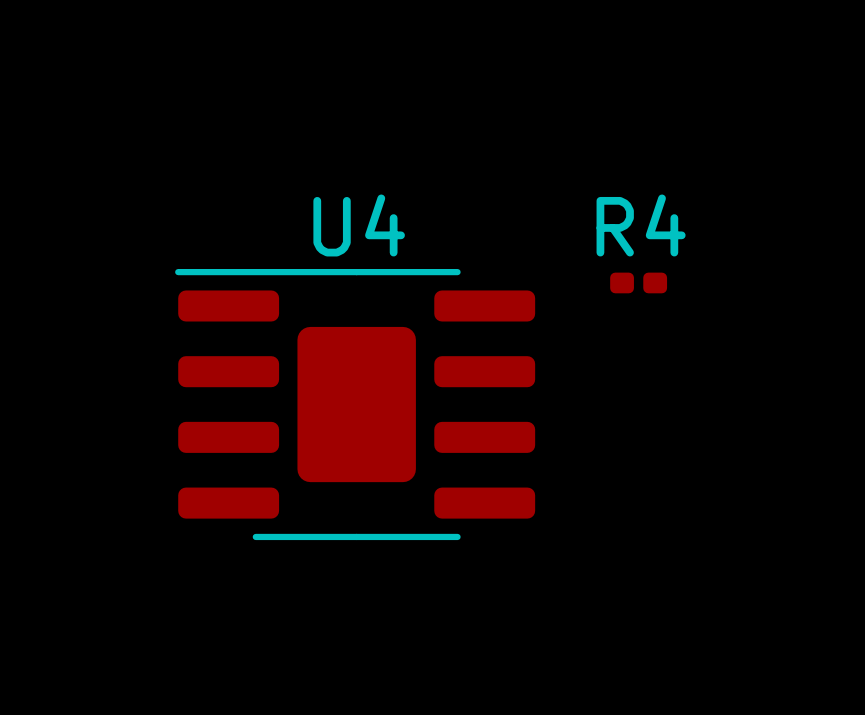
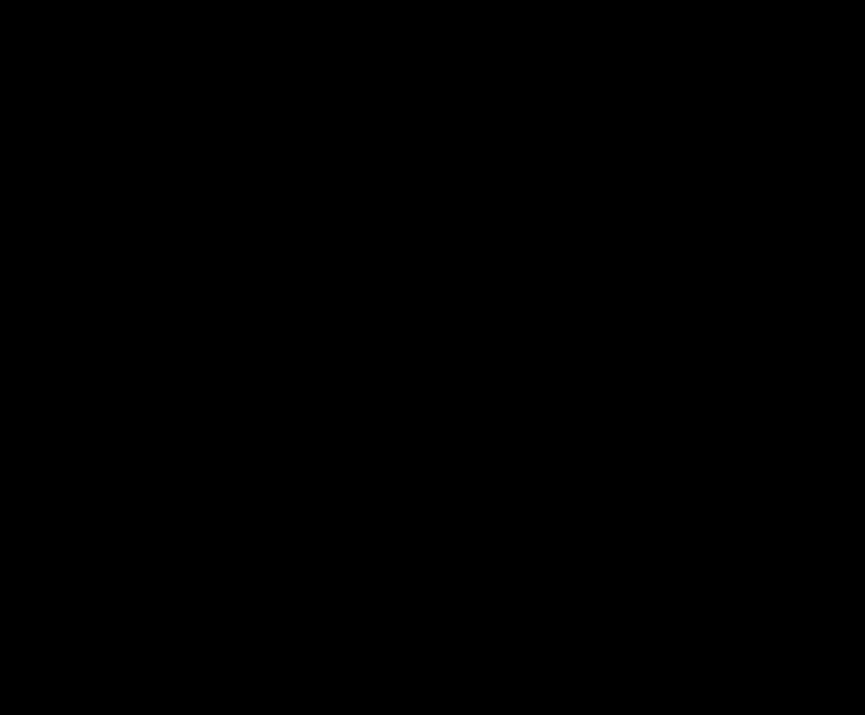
R4: (638, 282) -> none
U4: (355, 404) -> none

